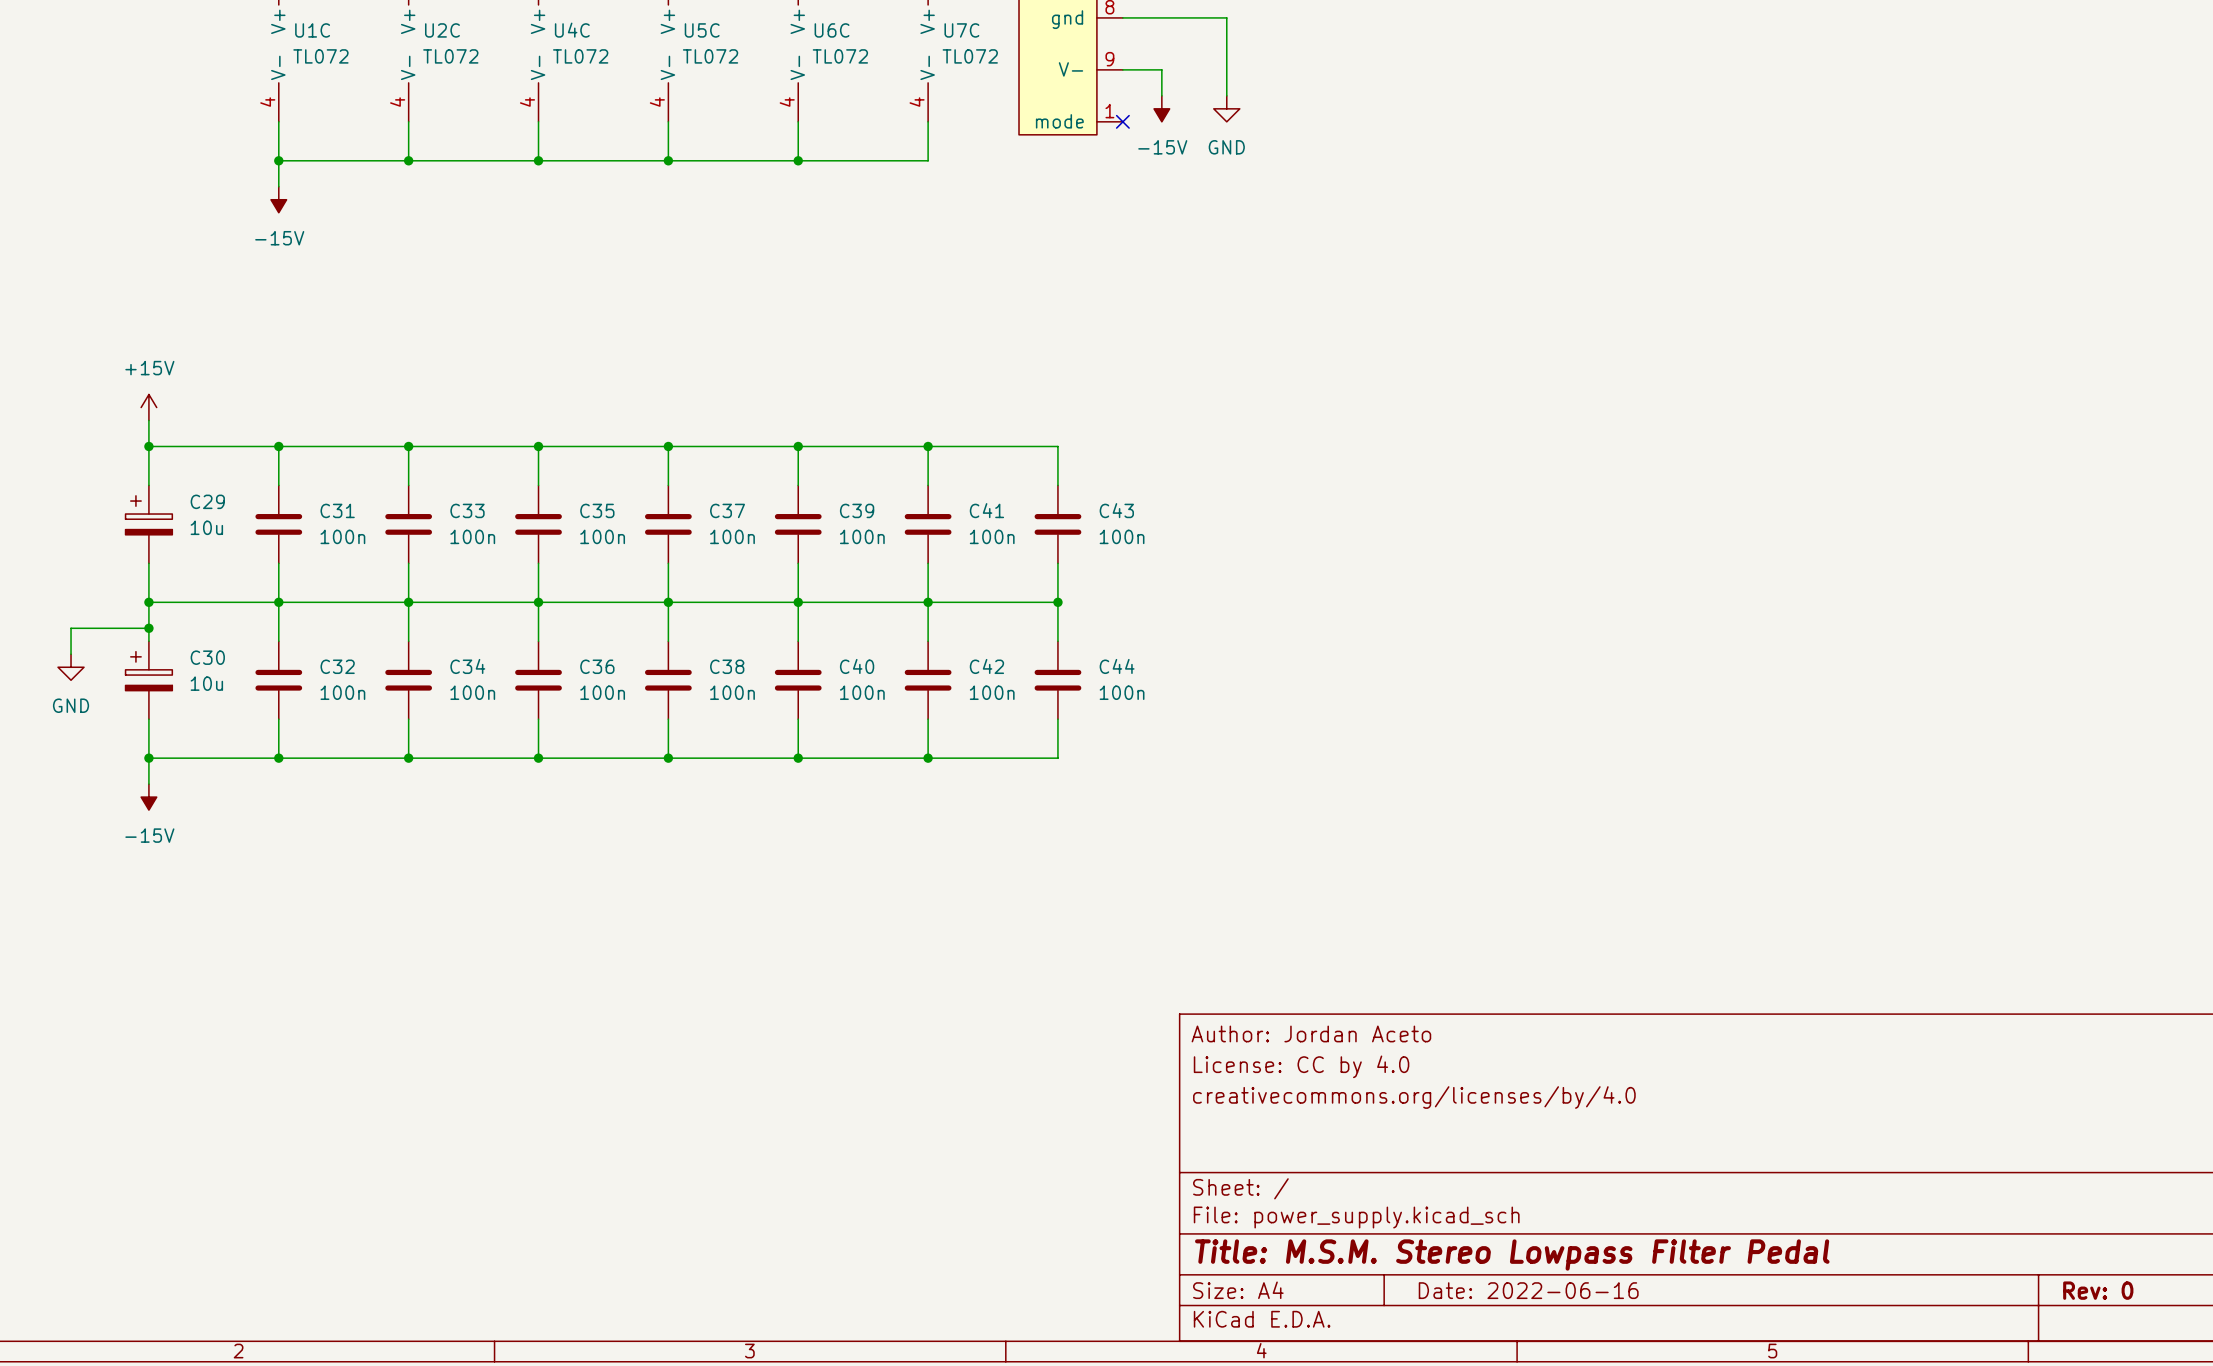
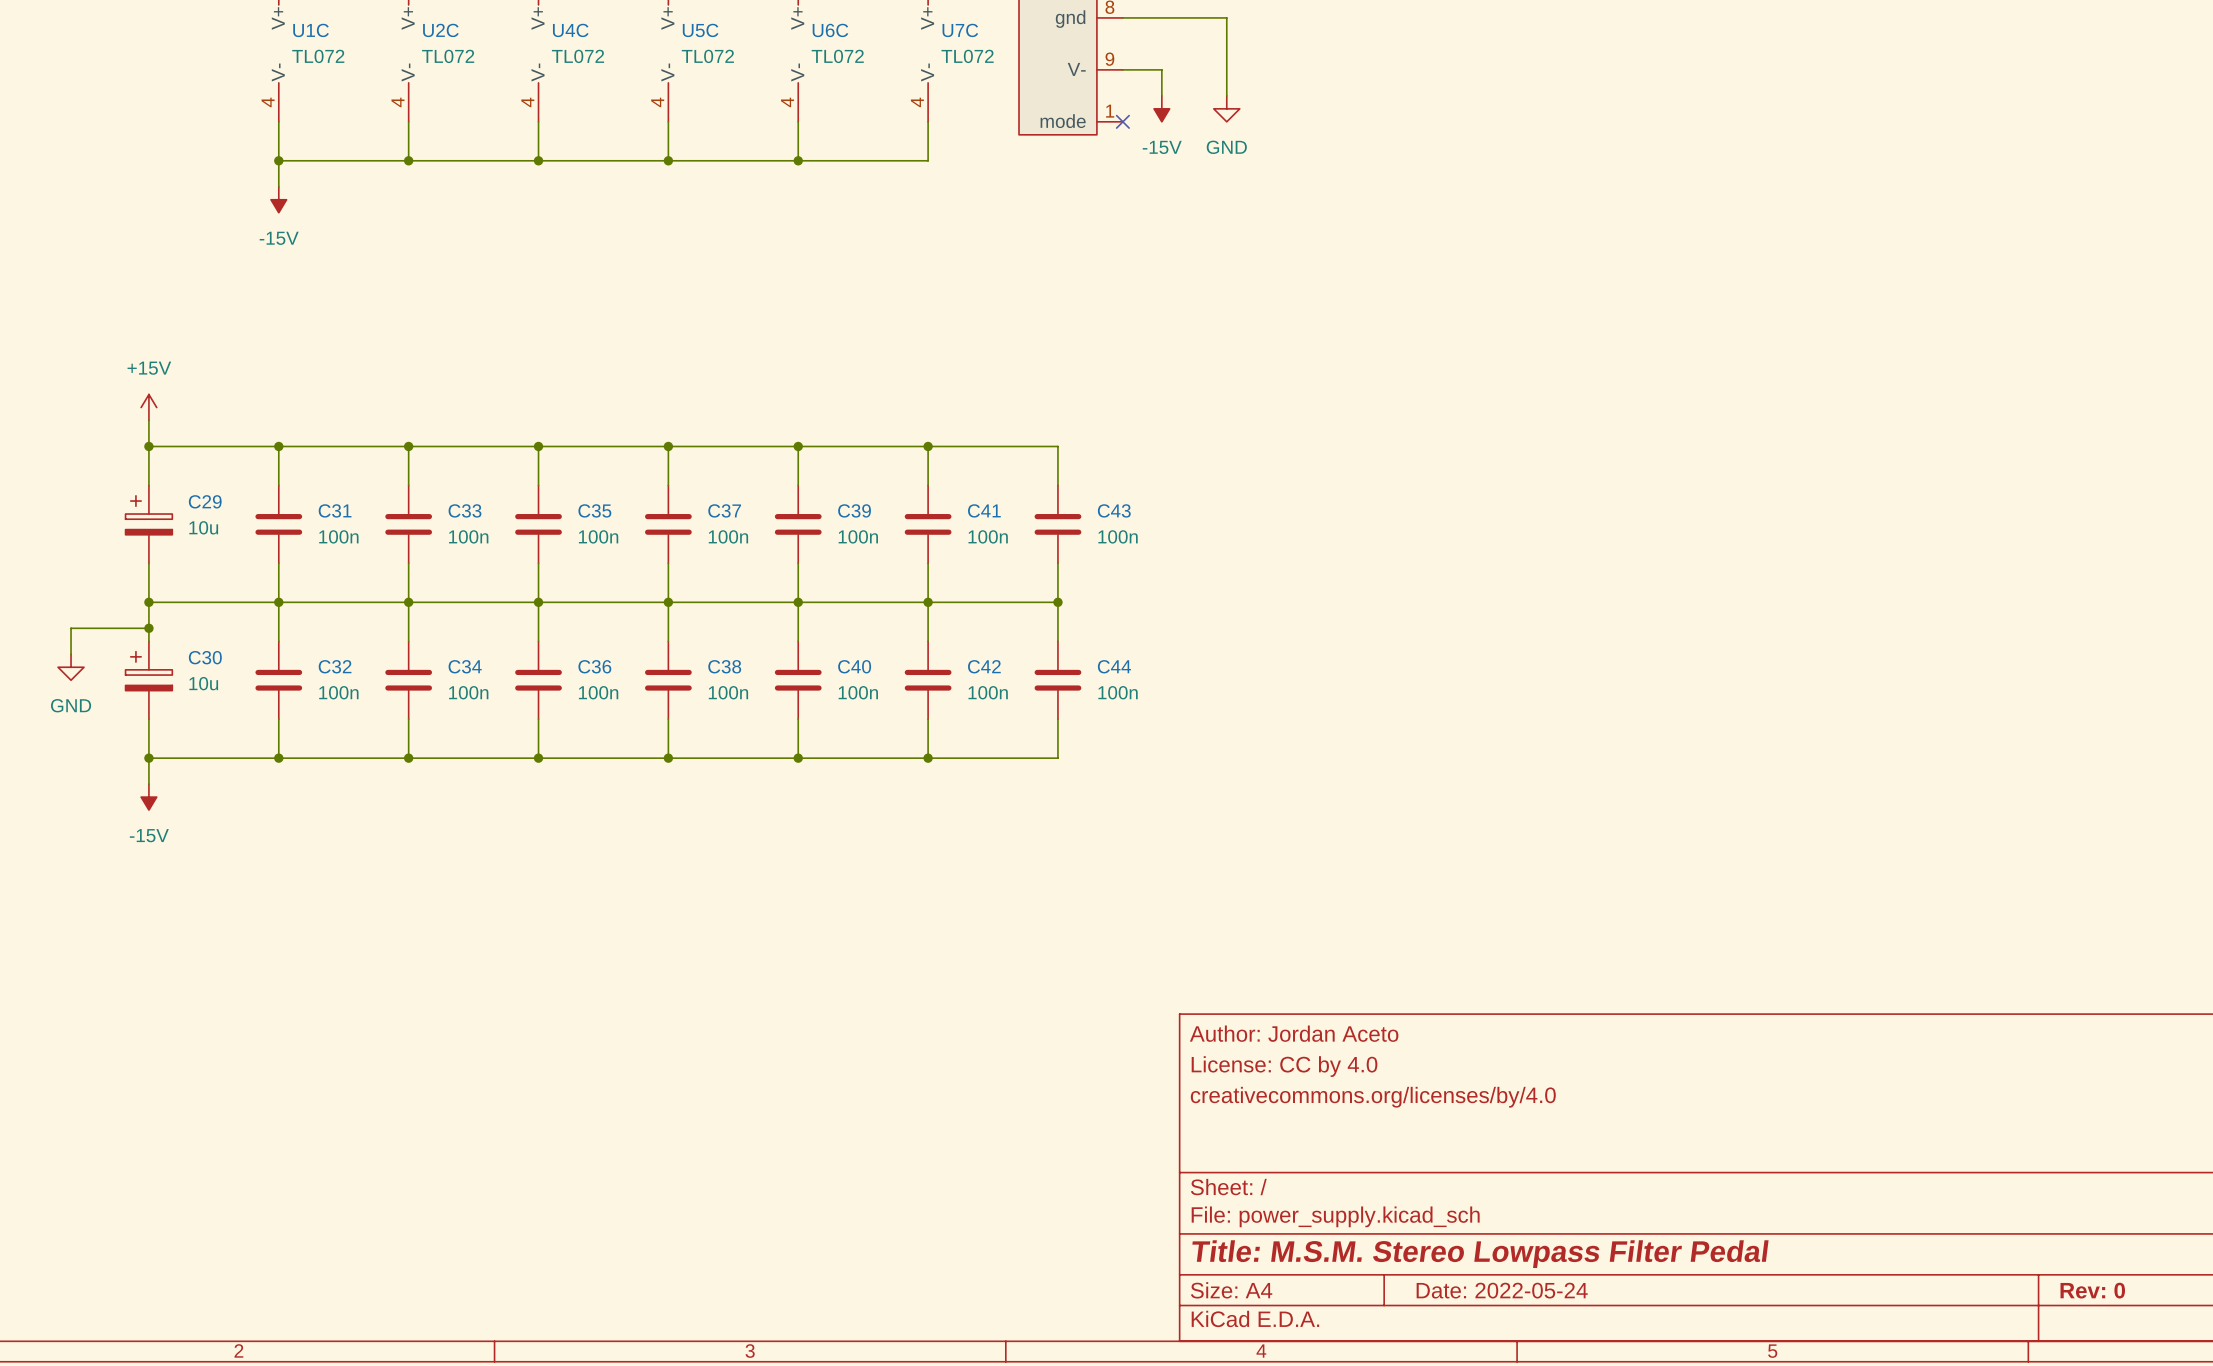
title block: Date: 2022-06-16 (1528, 1290) -> Date: 2022-05-24 (1502, 1290)

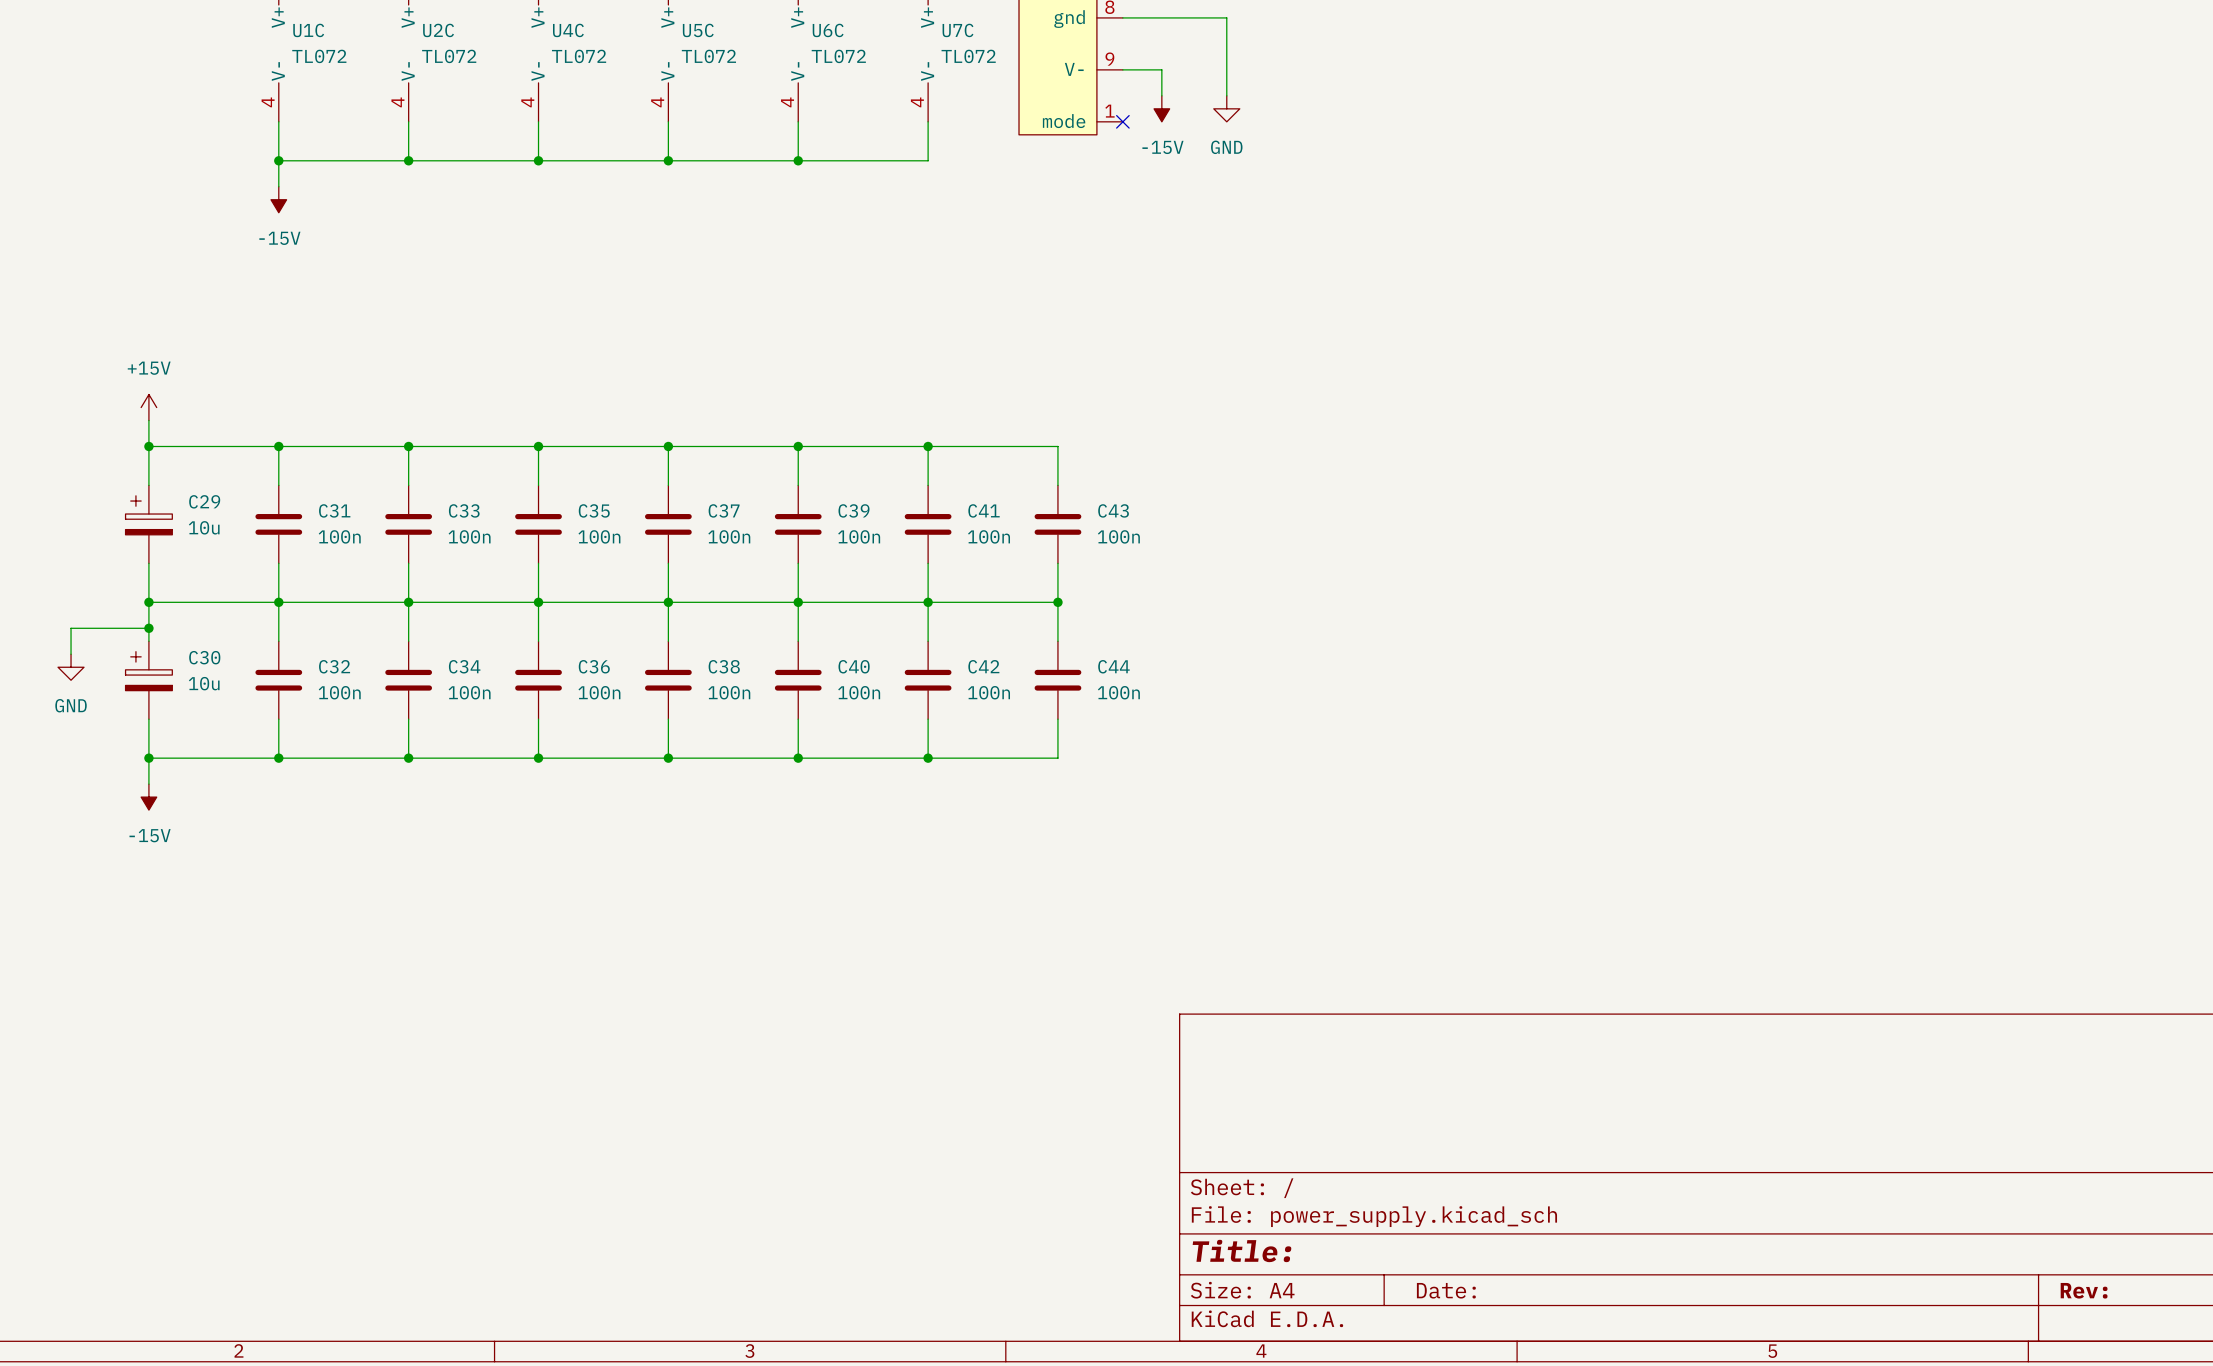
title block: Author: Jordan Aceto (1294, 1033) -> none
title block: License: CC by 4.0 (1284, 1066) -> none
title block: creativecommons.org/licenses/by/4.0 (1373, 1097) -> none
title block: Title: M.S.M. Stereo Lowpass Filter Pedal (1480, 1254) -> Title: (1242, 1250)
title block: Date: 2022-05-24 (1502, 1290) -> Date: (1446, 1290)
title block: Rev: 0 (2092, 1290) -> Rev: (2084, 1290)

